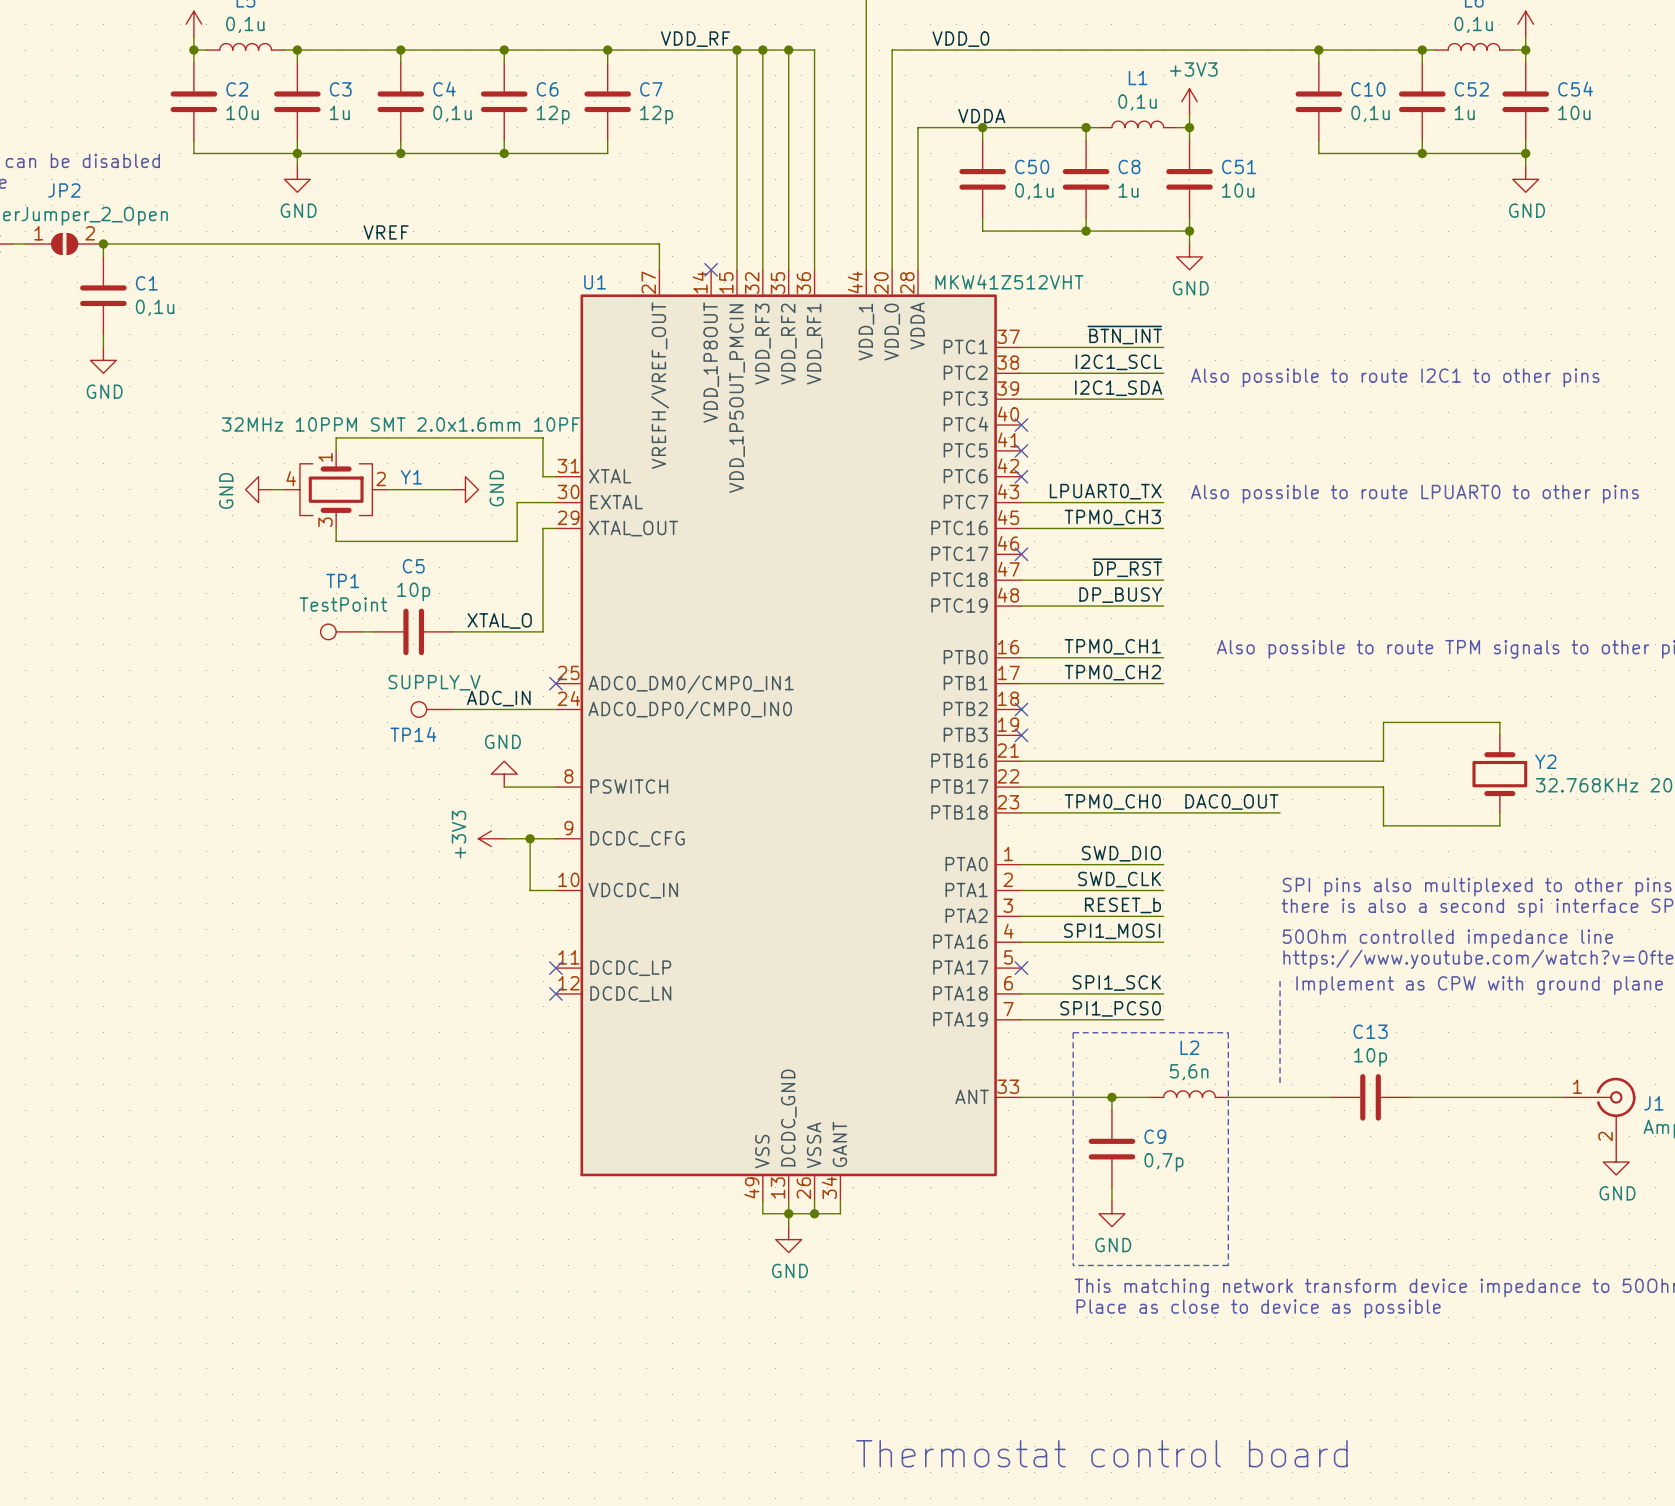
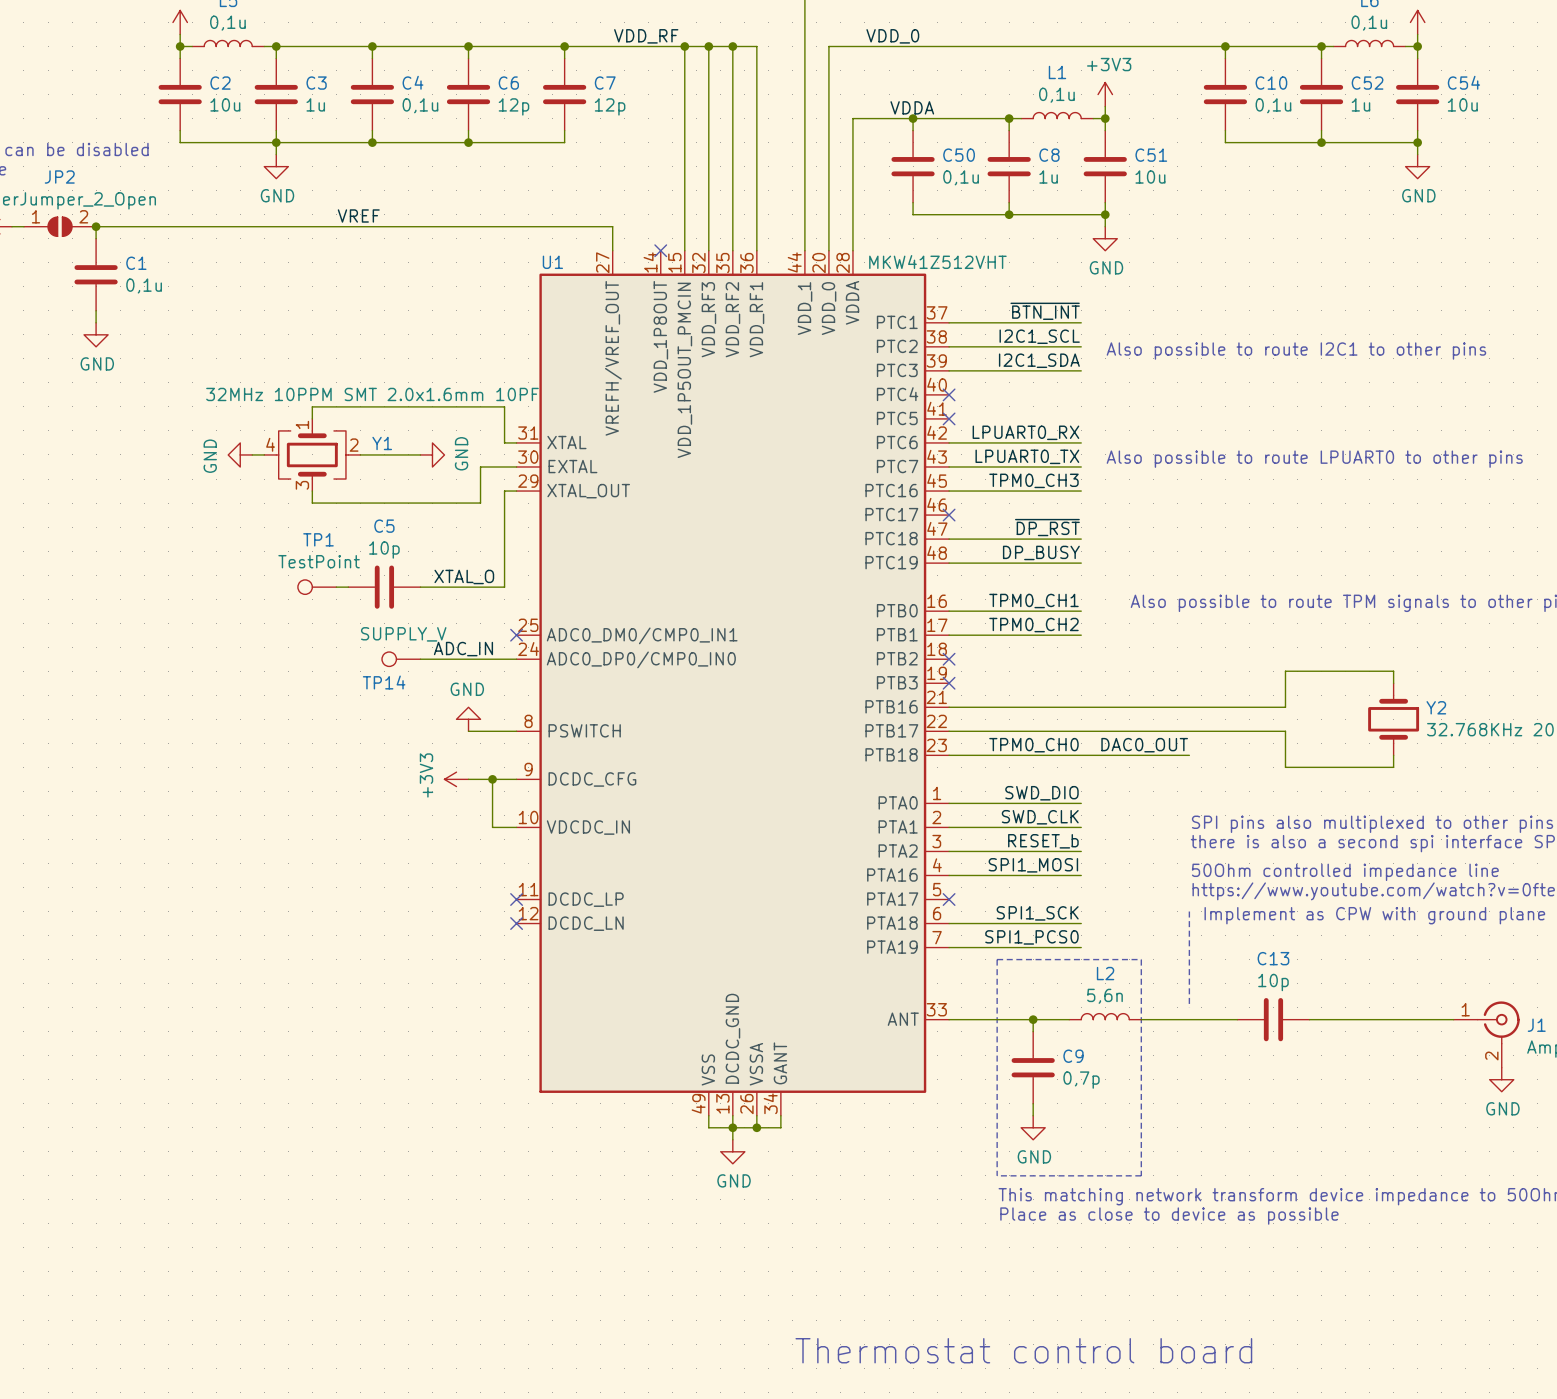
label: none -> LPUART0_RX (1025, 432)
wire: none -> (949, 442) (1081, 442)
no-connect mark: (1021, 476) -> none

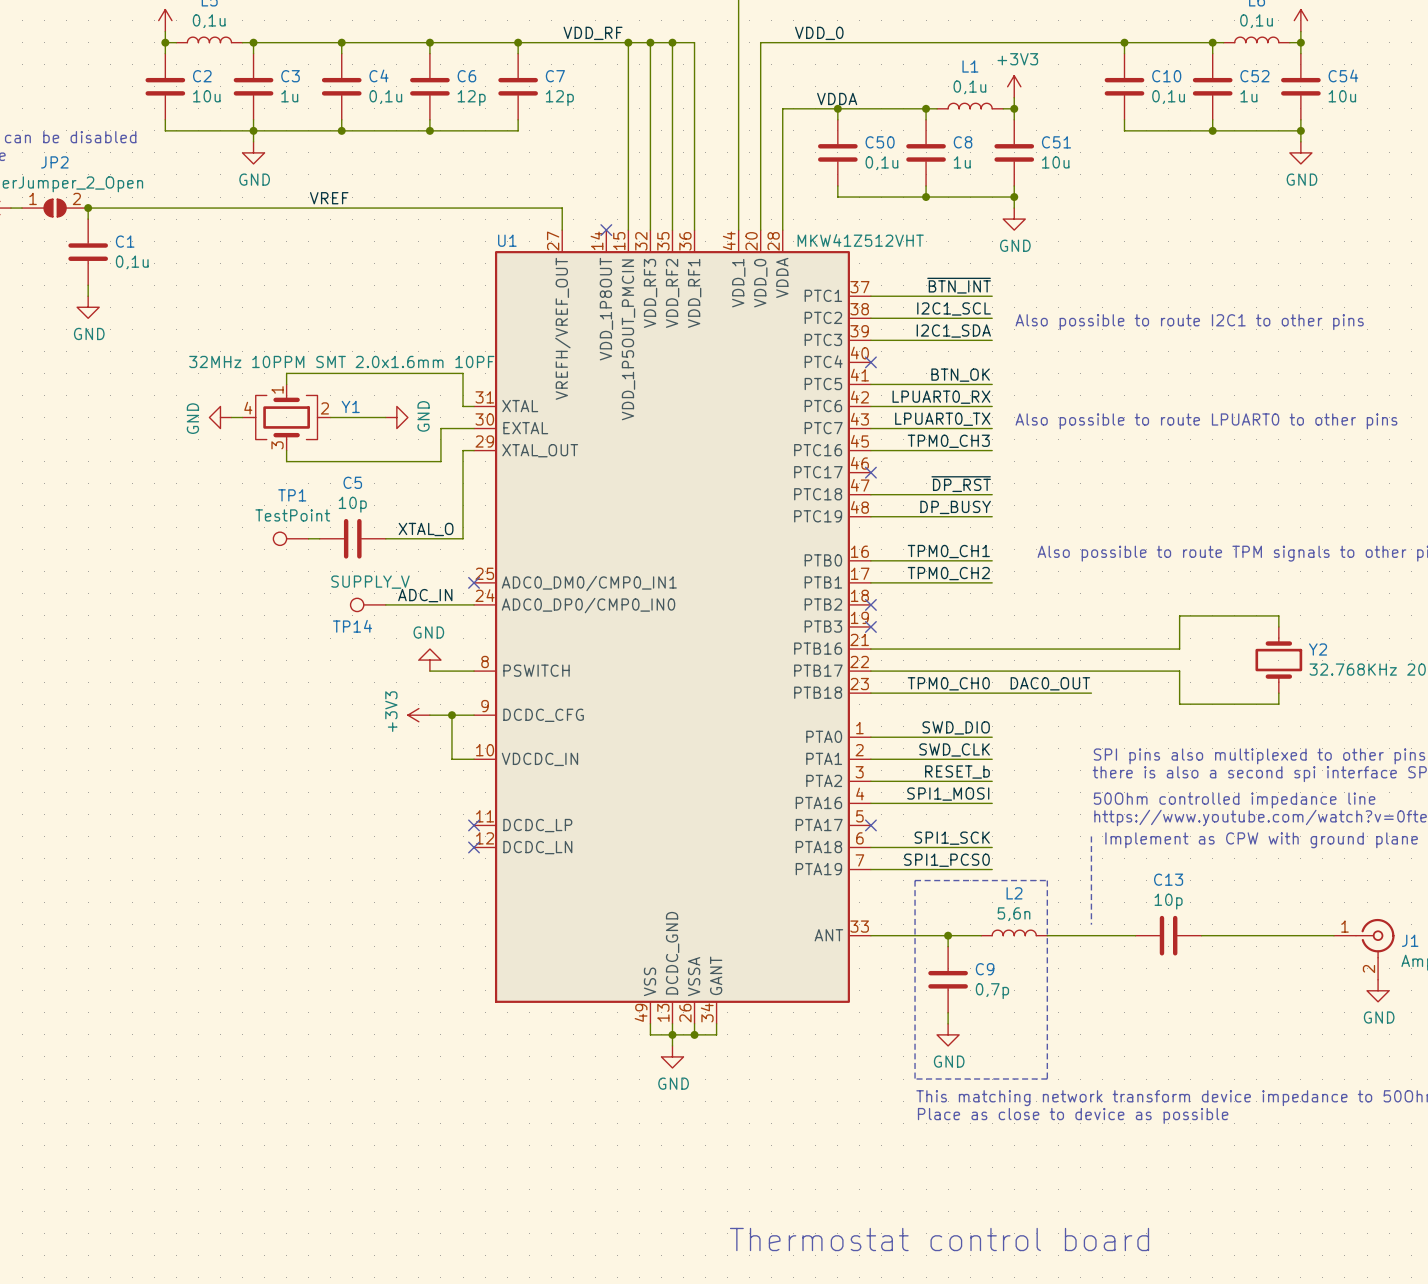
label: none -> BTN_OK (960, 375)
wire: none -> (870, 384) (992, 384)
no-connect mark: (949, 418) -> none

